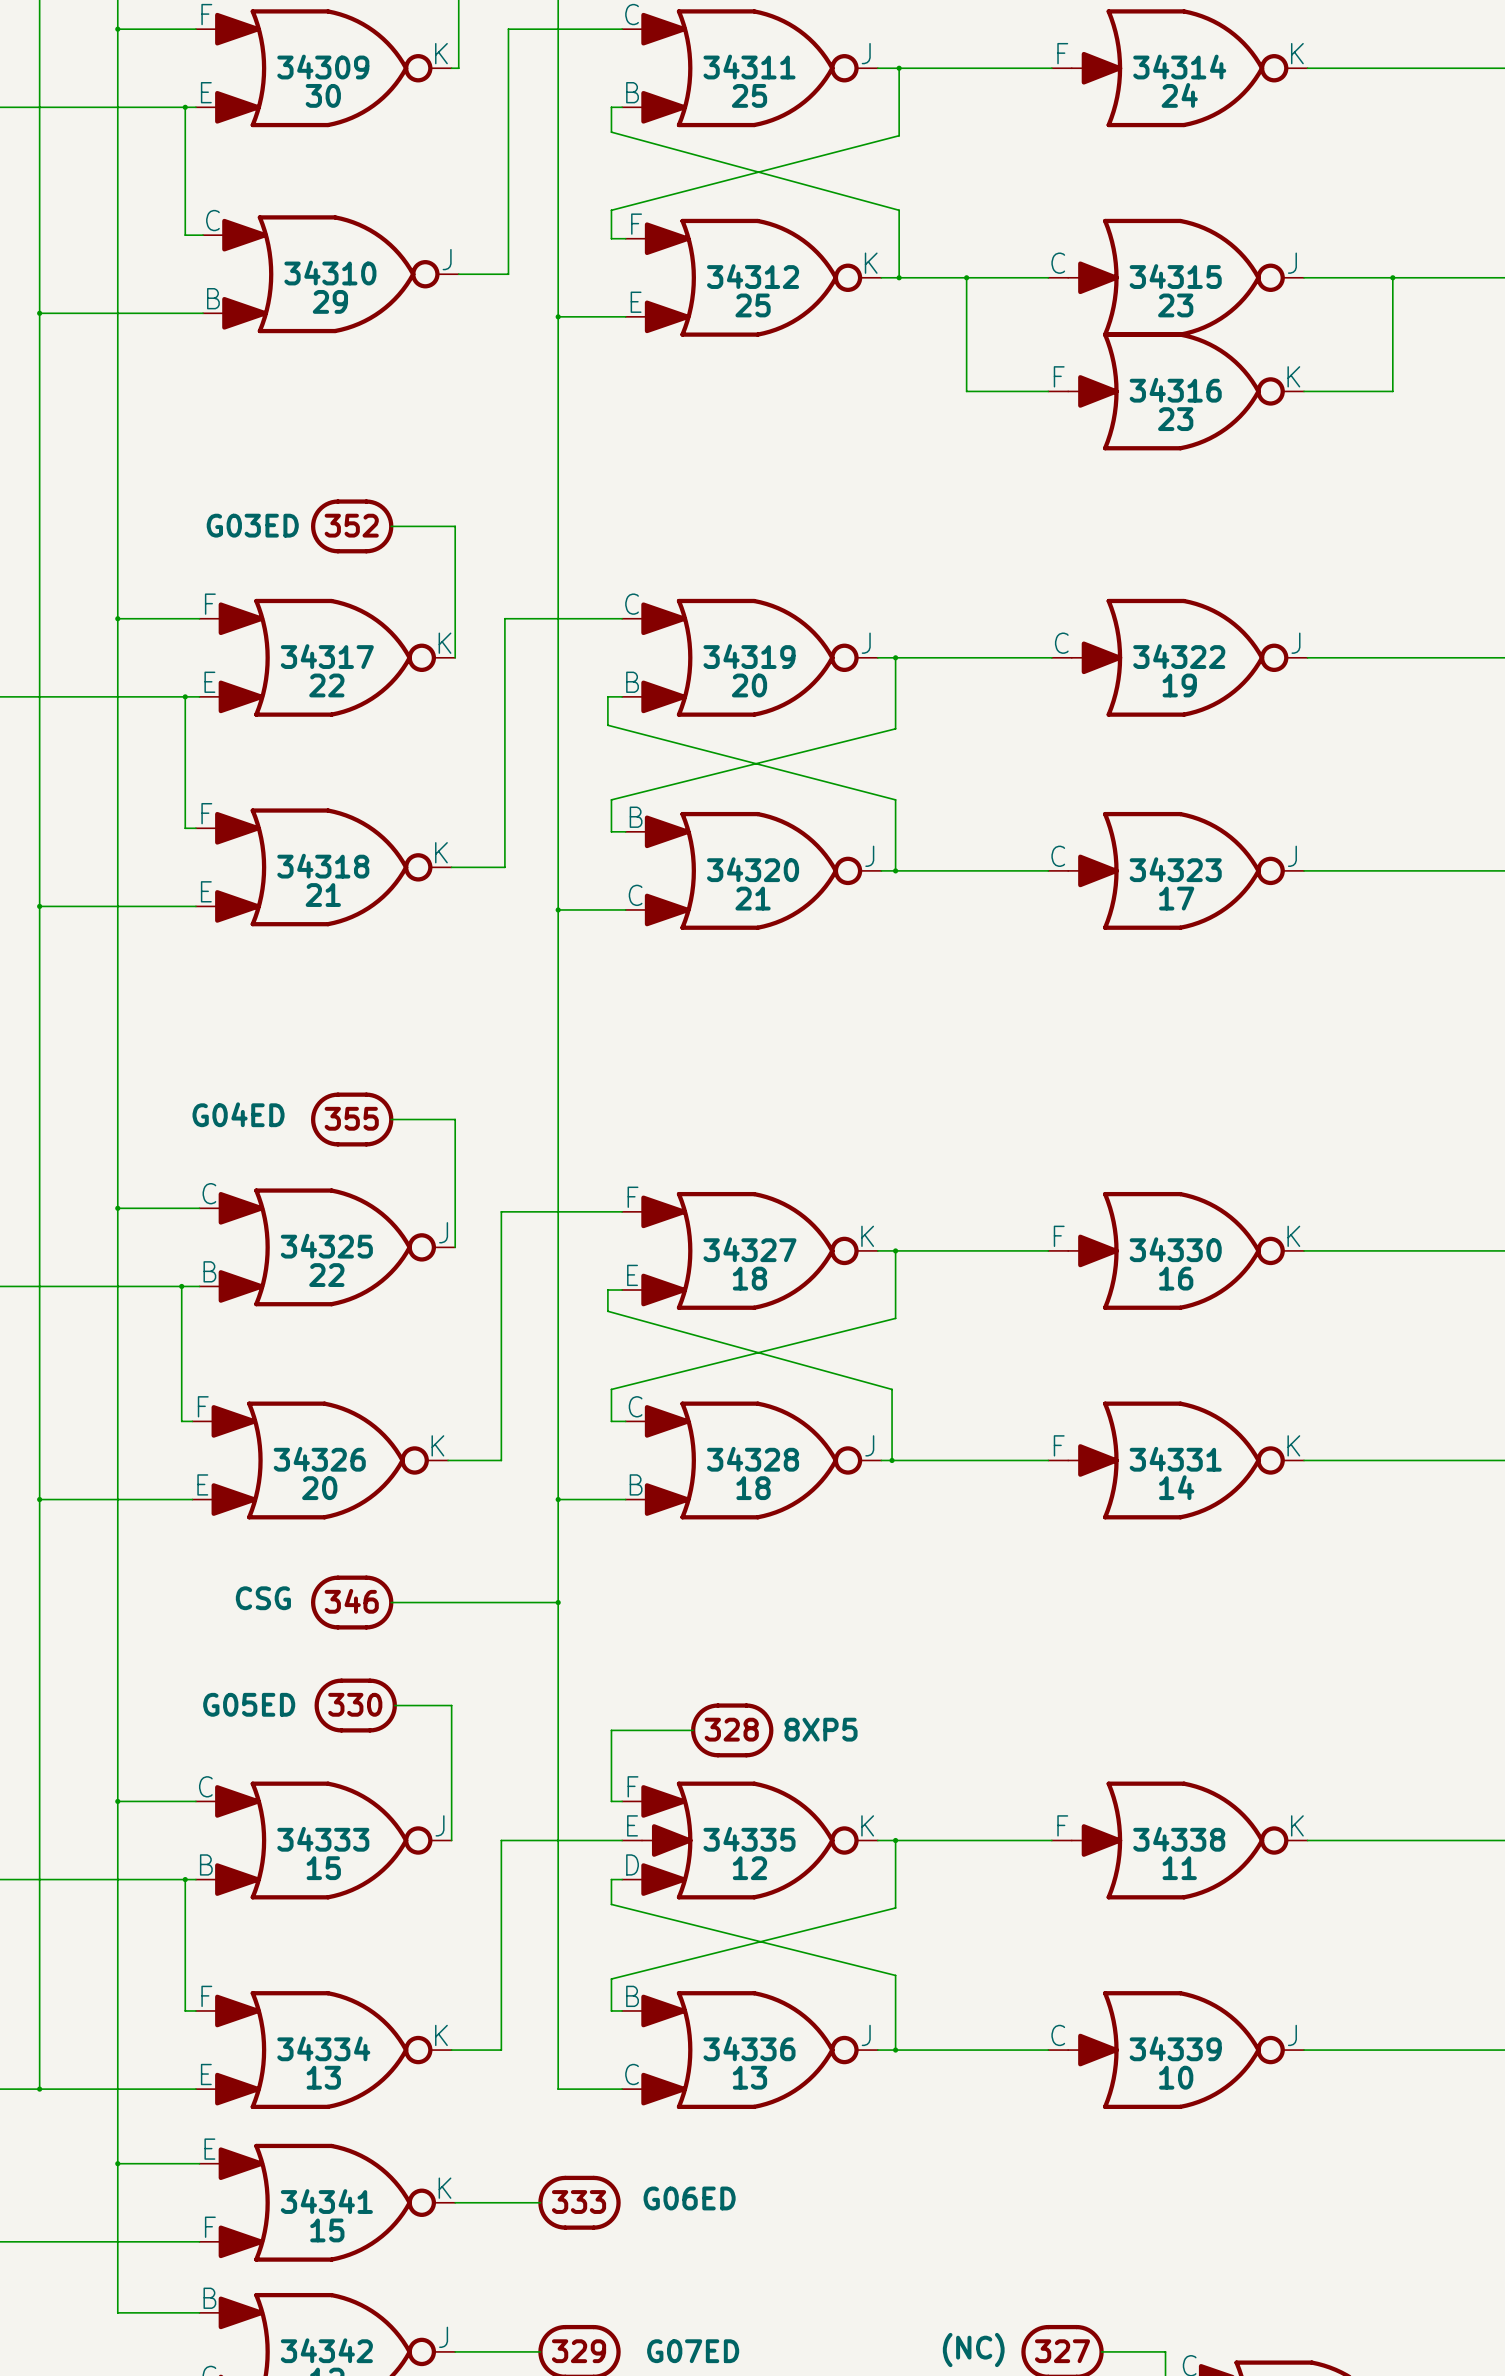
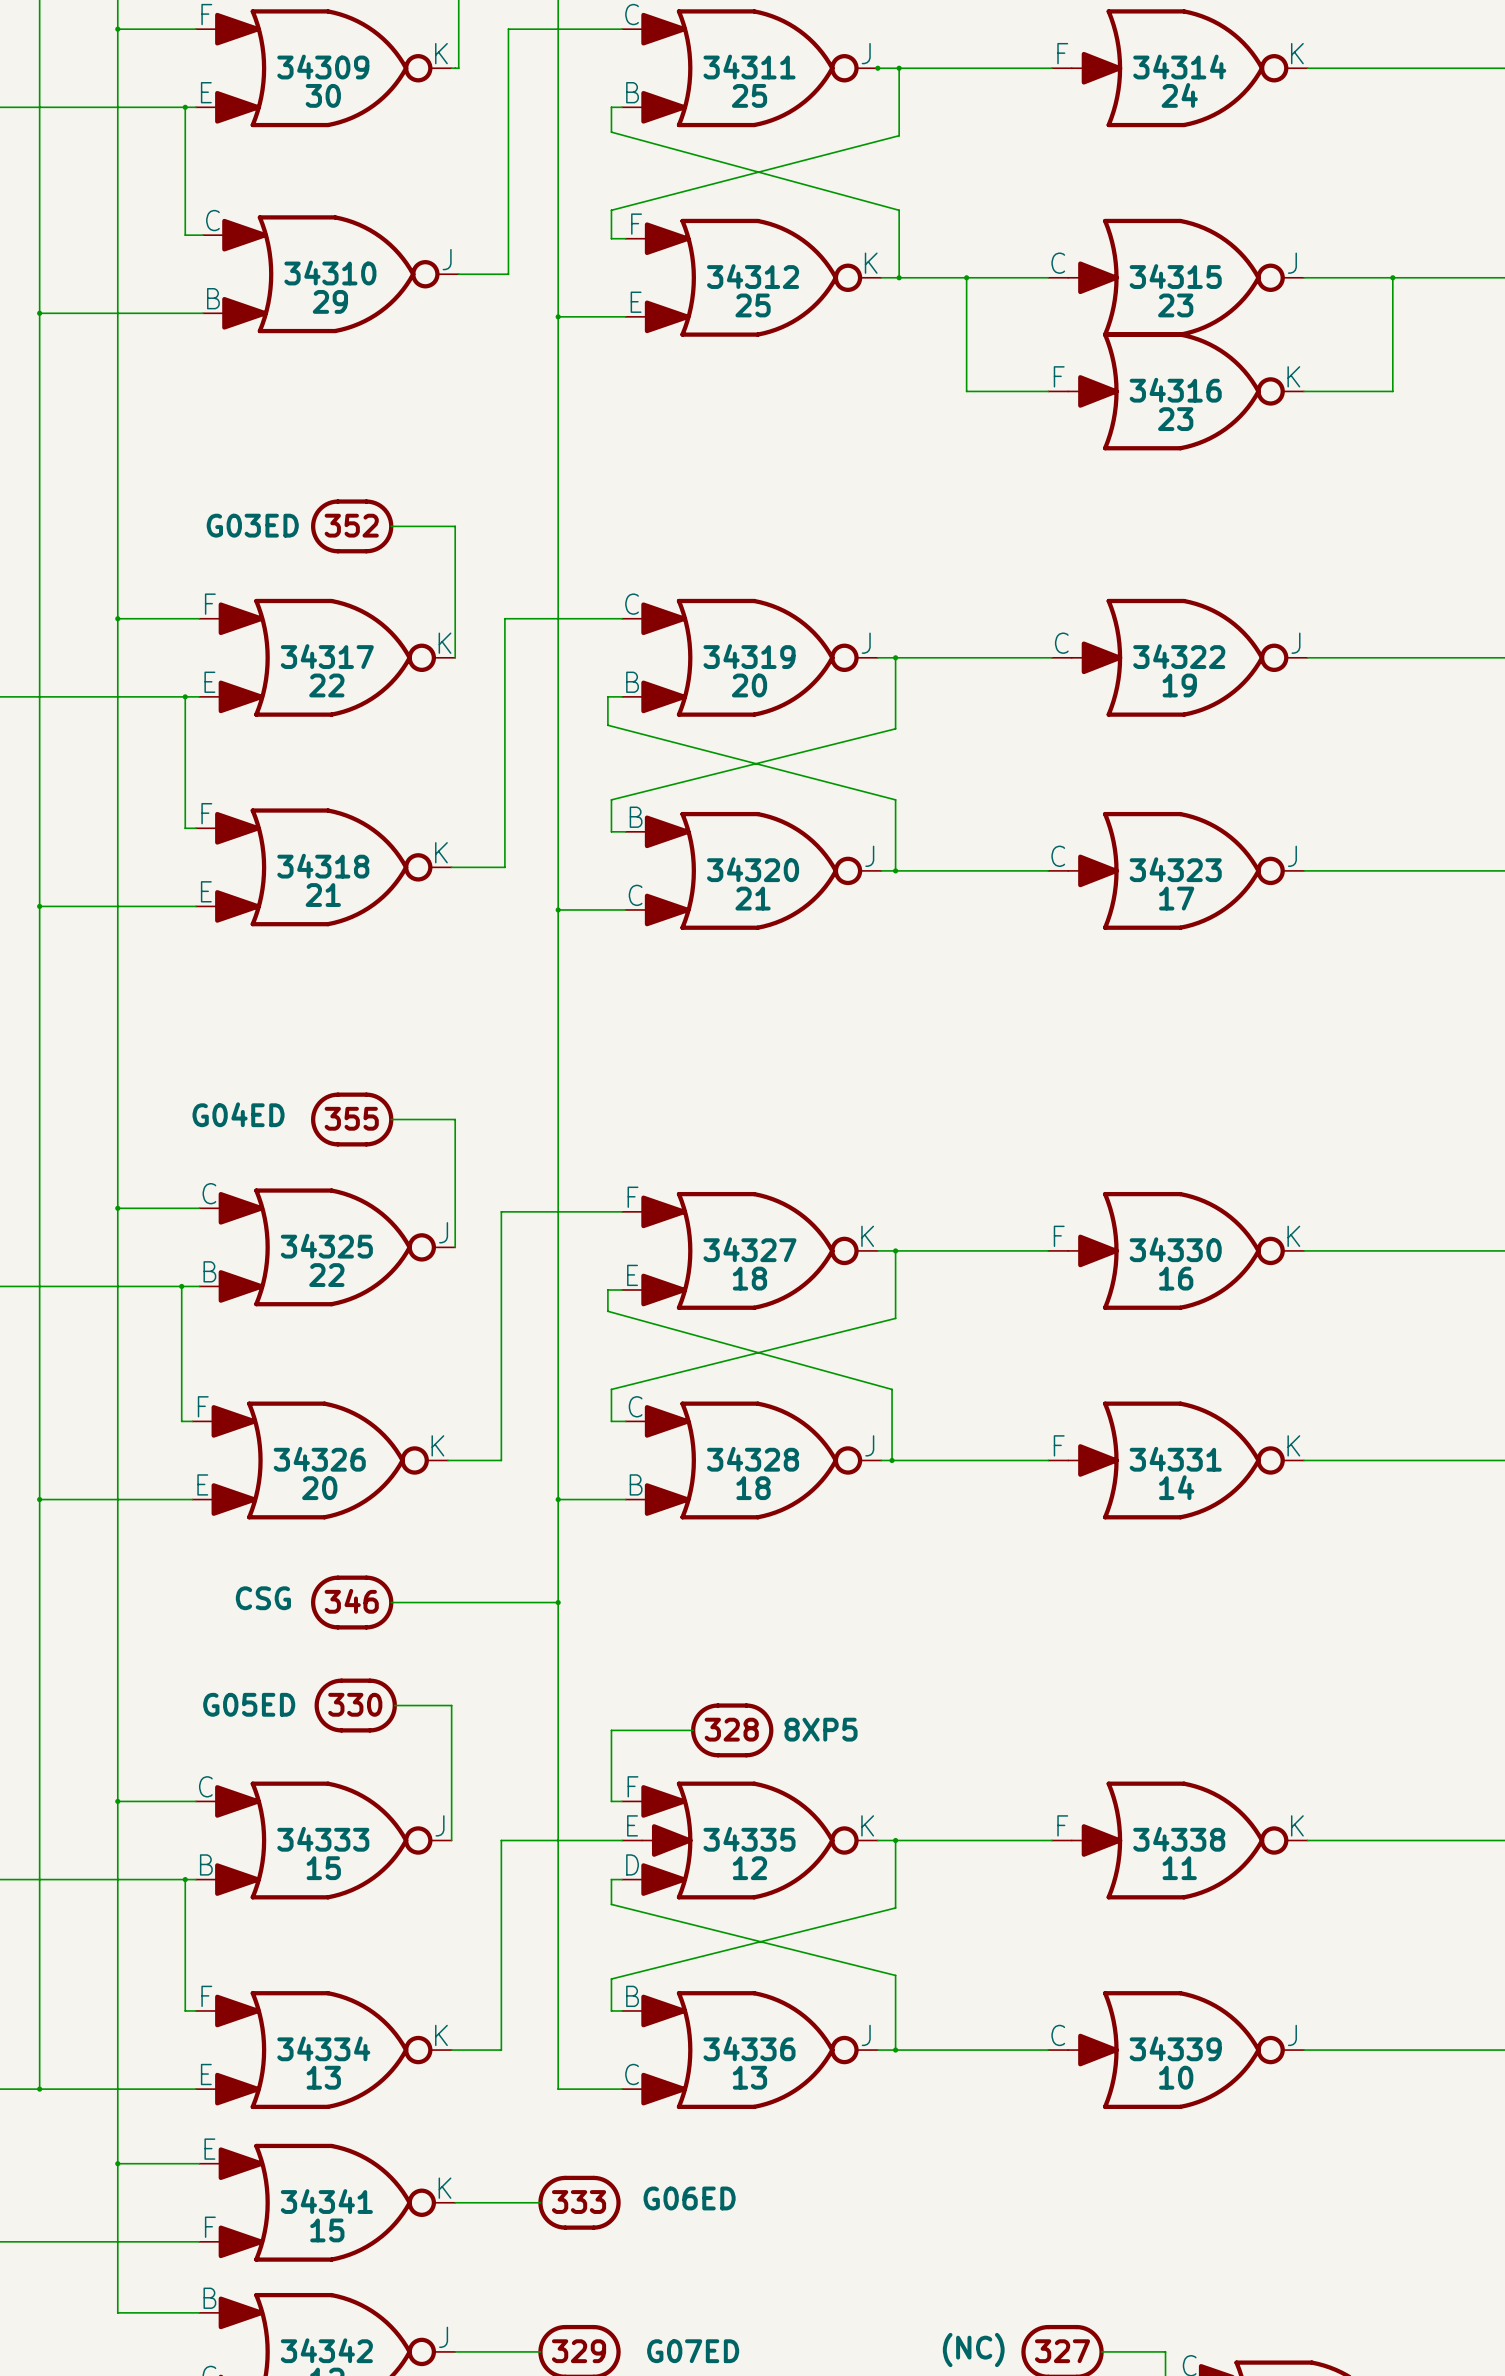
junction: none -> (877, 68)

